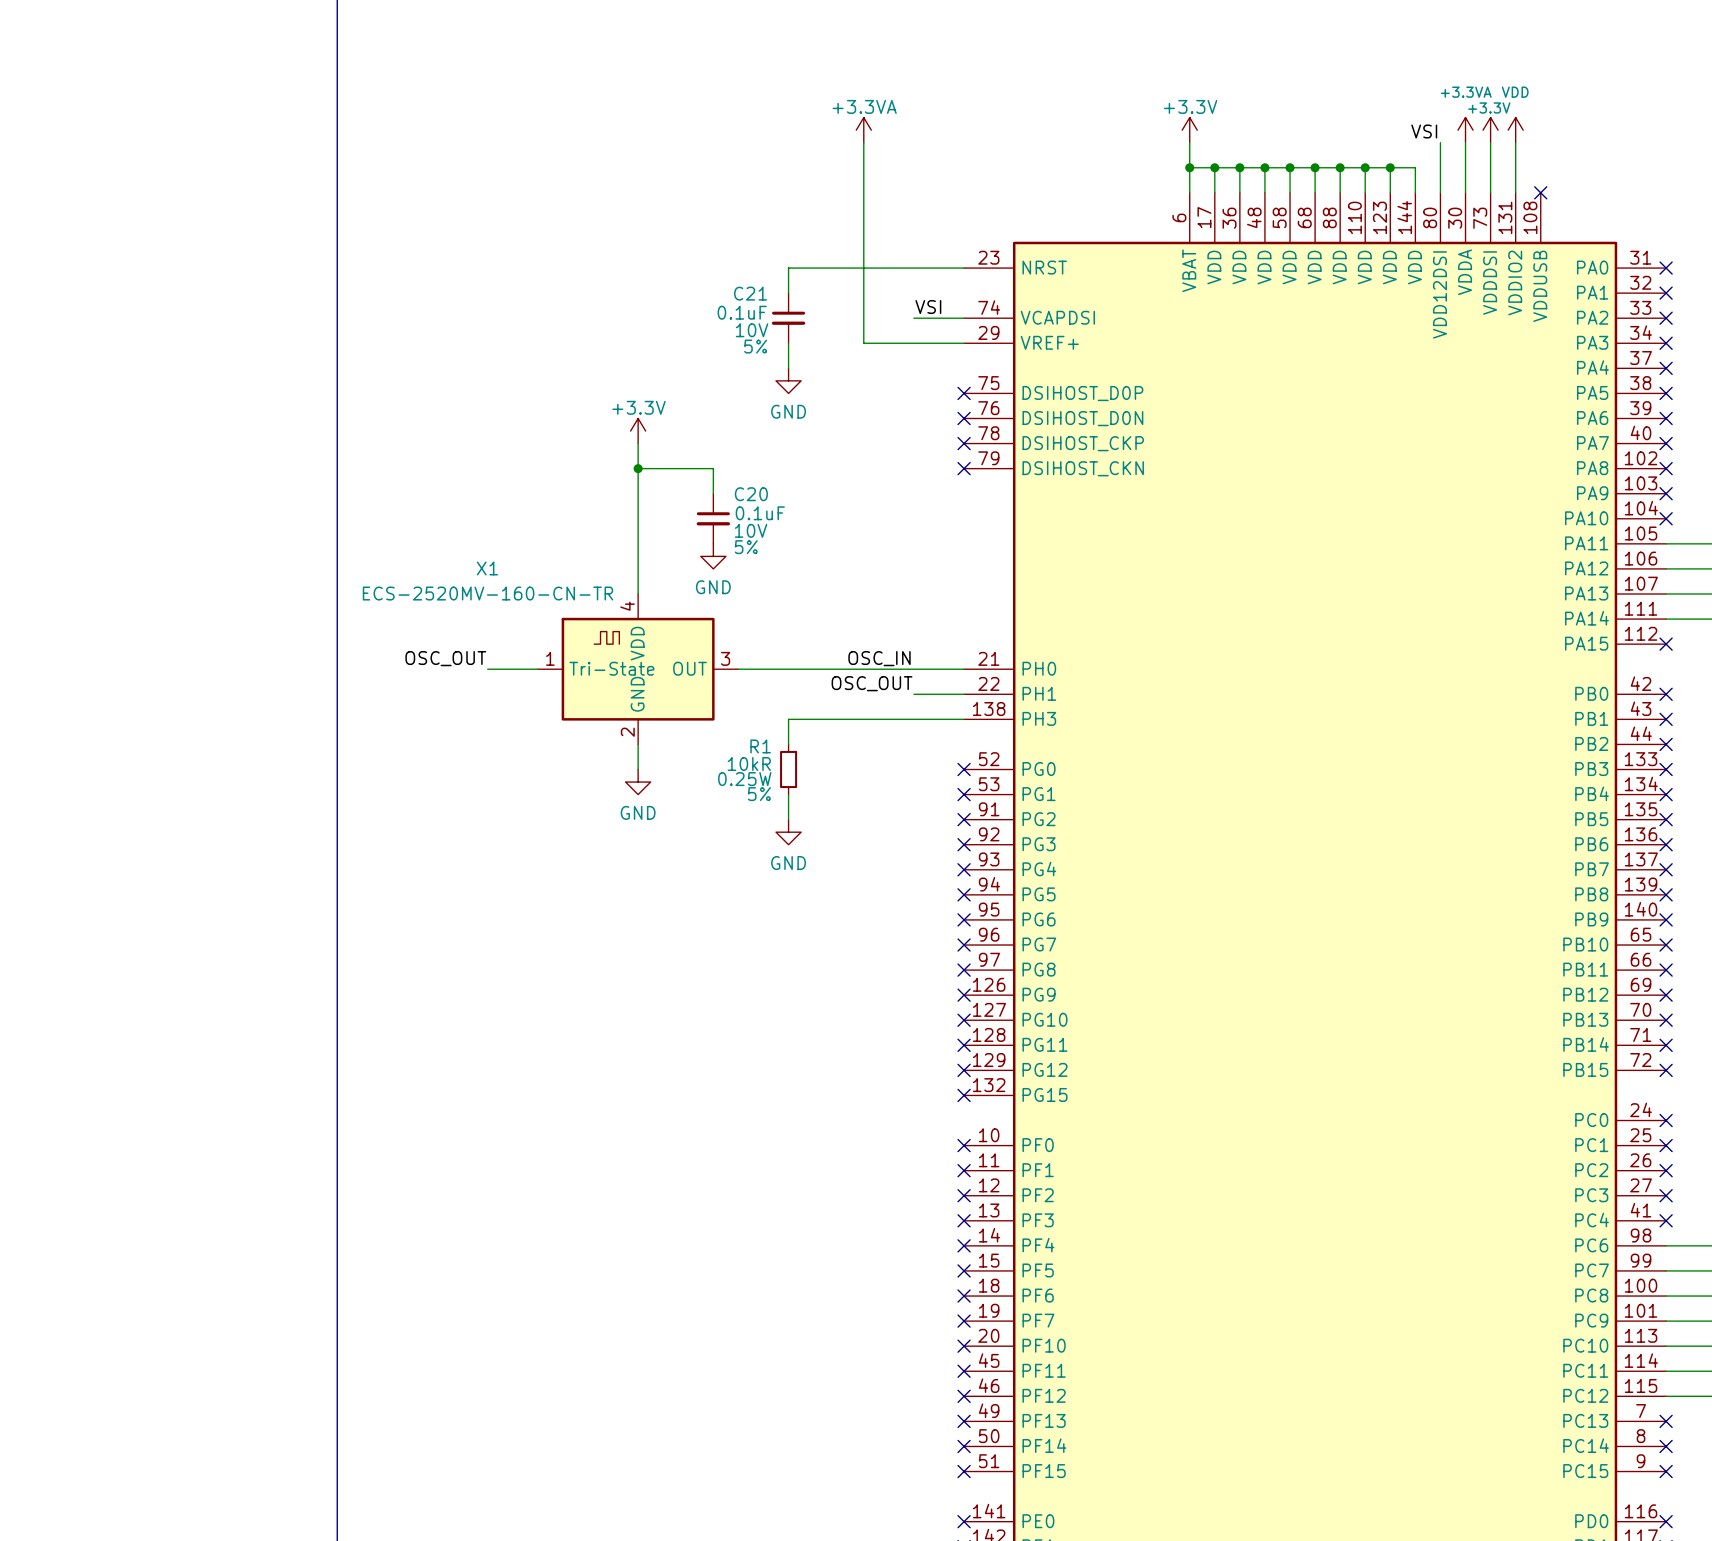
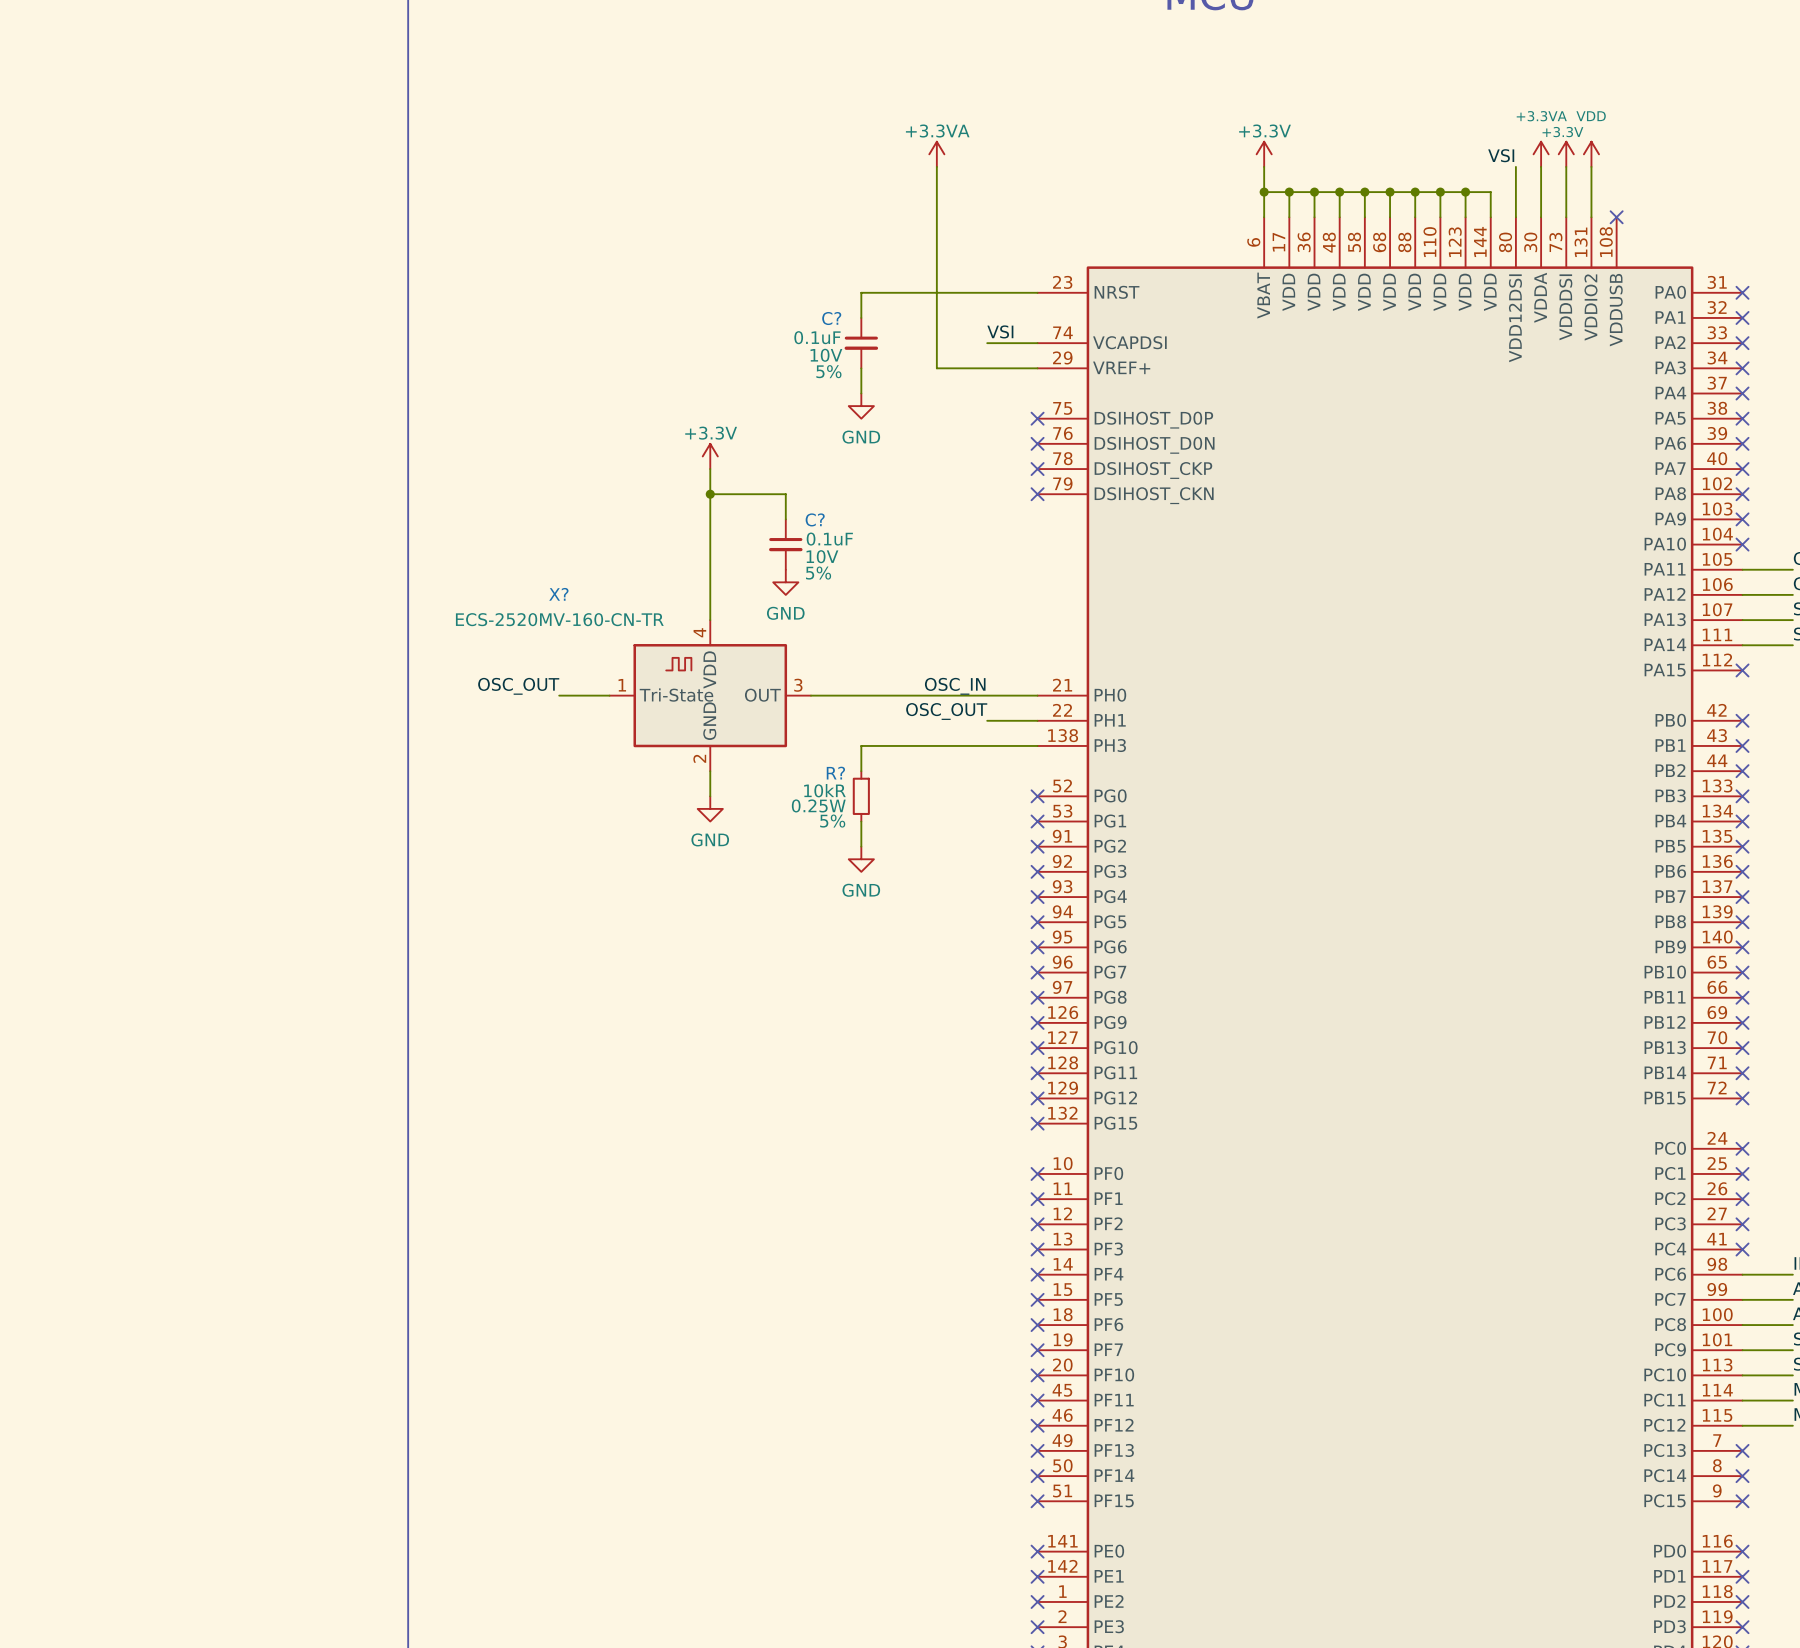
C21 name: C21 (750, 293) -> C? (831, 318)
C20 name: C20 (751, 494) -> C? (815, 519)
X1 name: X1 (487, 568) -> X? (558, 594)
R1 name: R1 (760, 746) -> R? (835, 773)

